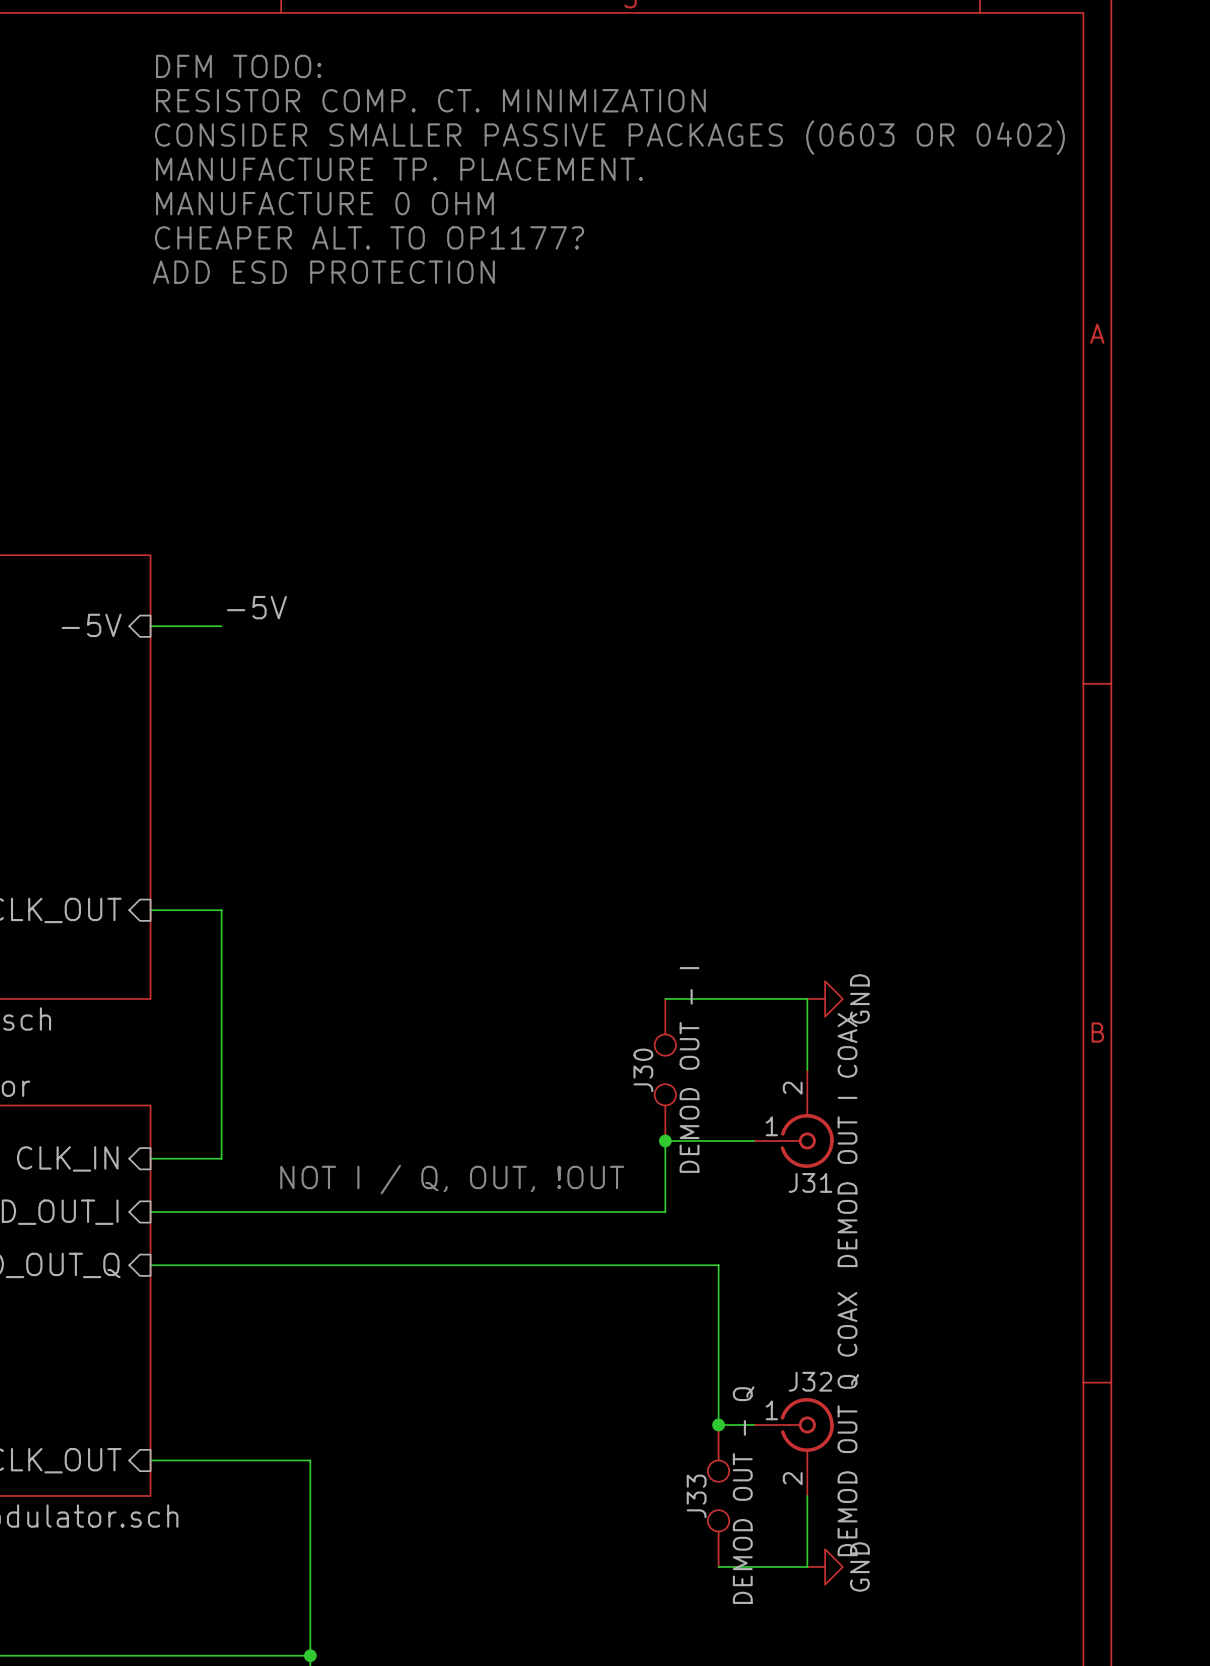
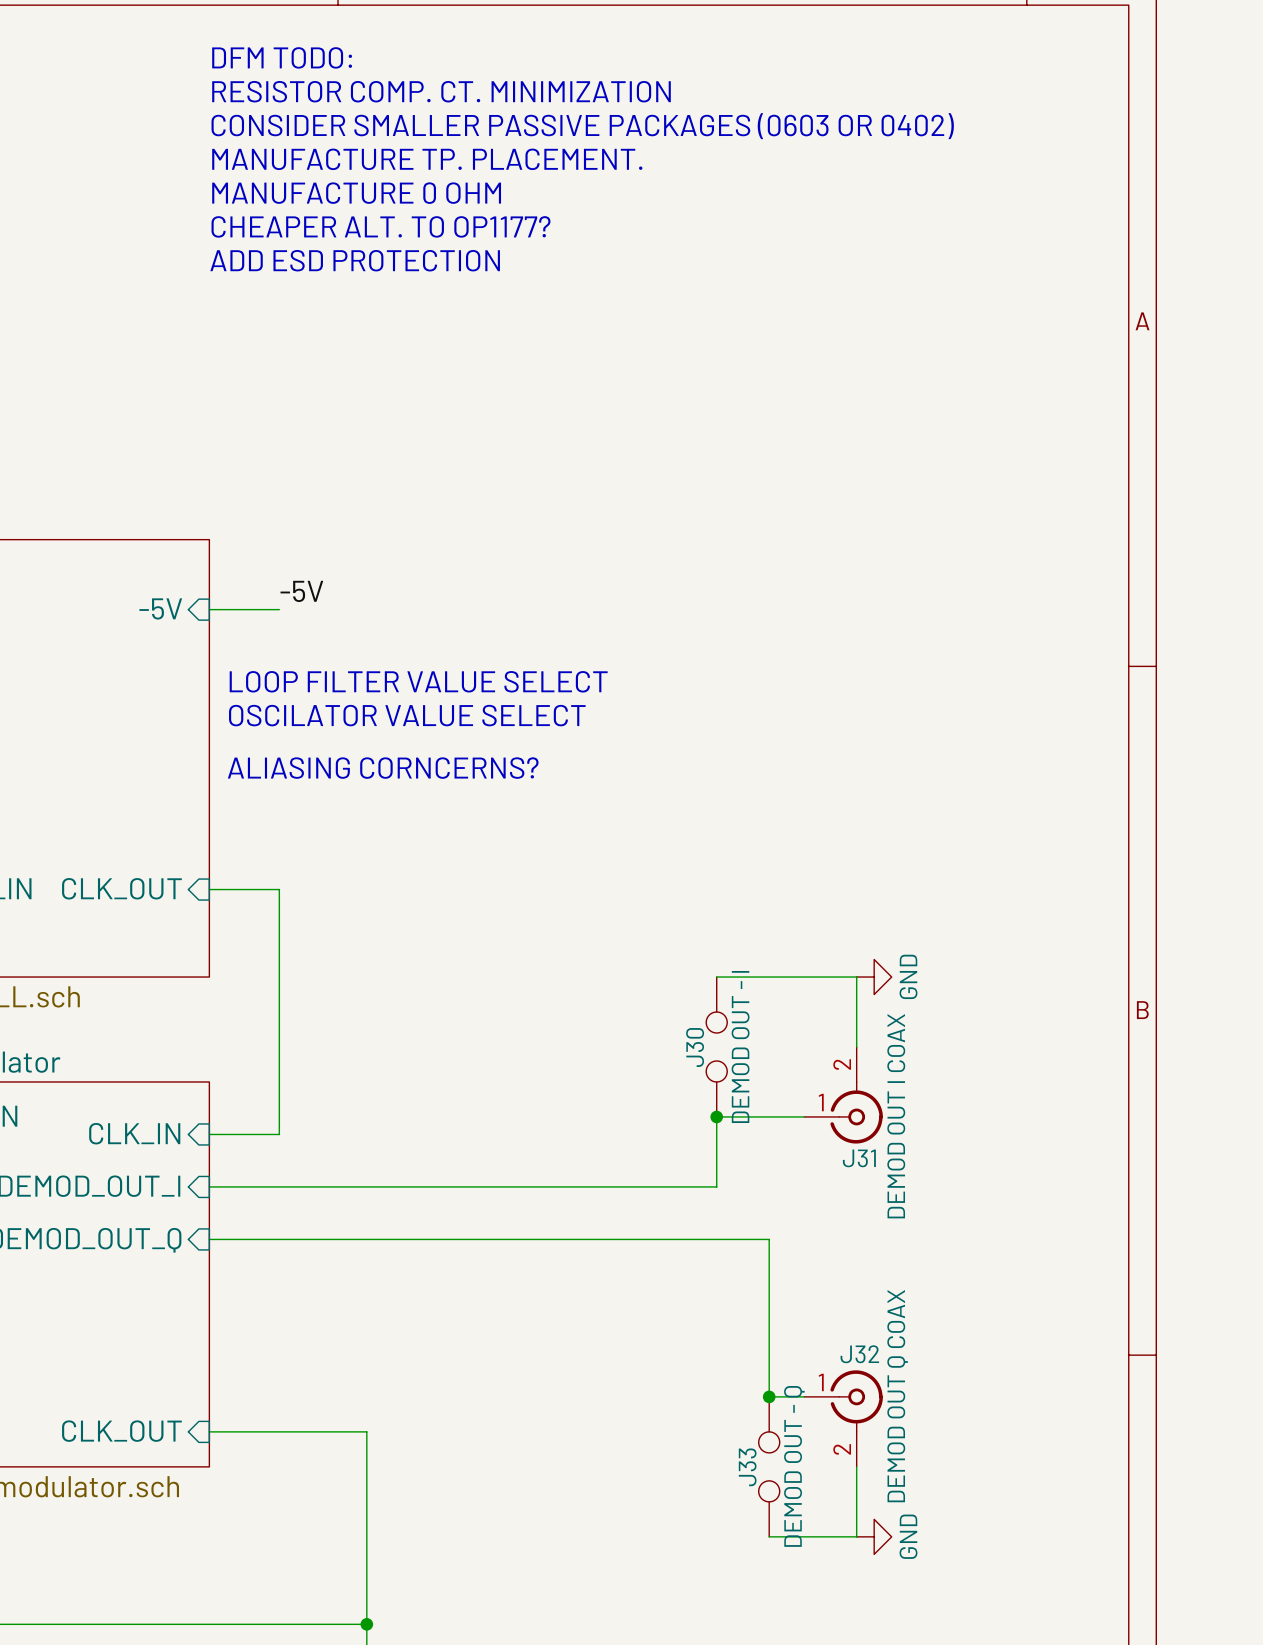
text: none -> LOOP FILTER VALUE SELECT (418, 681)
text: none -> OSCILATOR VALUE SELECT (407, 715)
text: none -> ALIASING CORNCERNS? (383, 768)
text: NOT I / Q, OUT, !OUT (452, 1179) -> none

